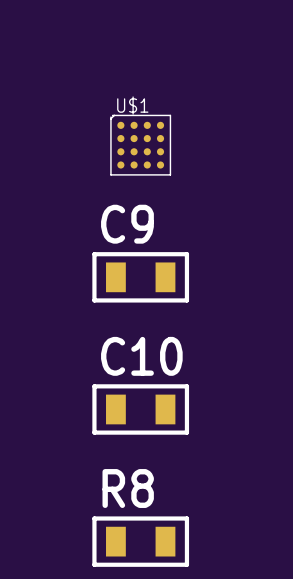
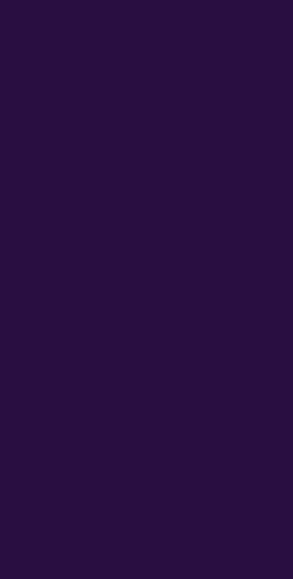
U$1: (140, 145) -> none
C9: (140, 277) -> none
C10: (140, 409) -> none
R8: (140, 541) -> none

